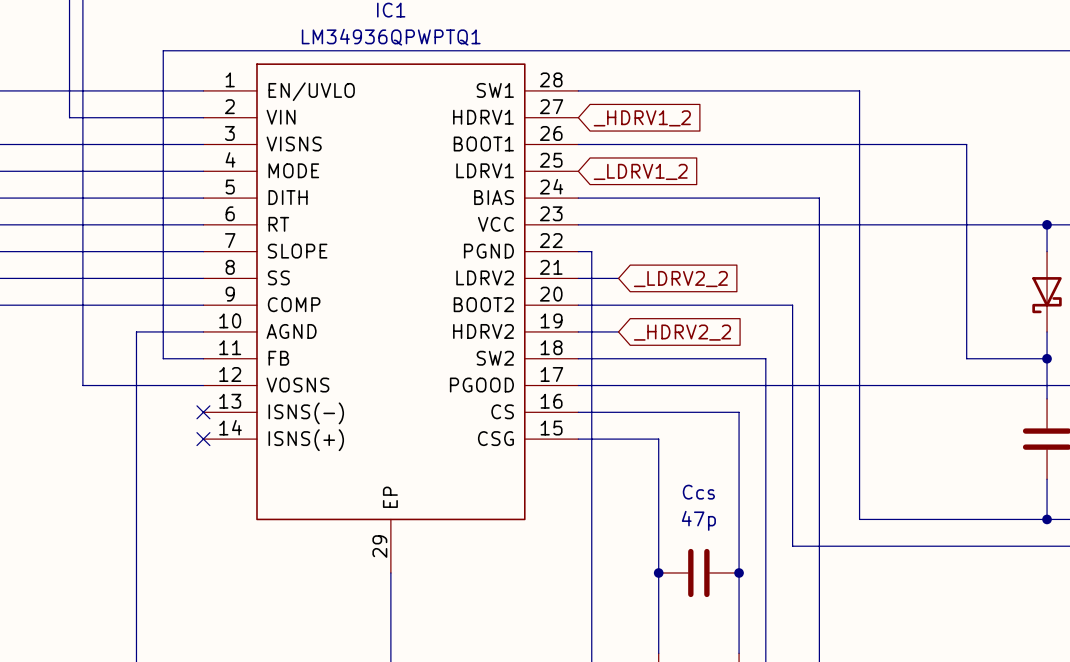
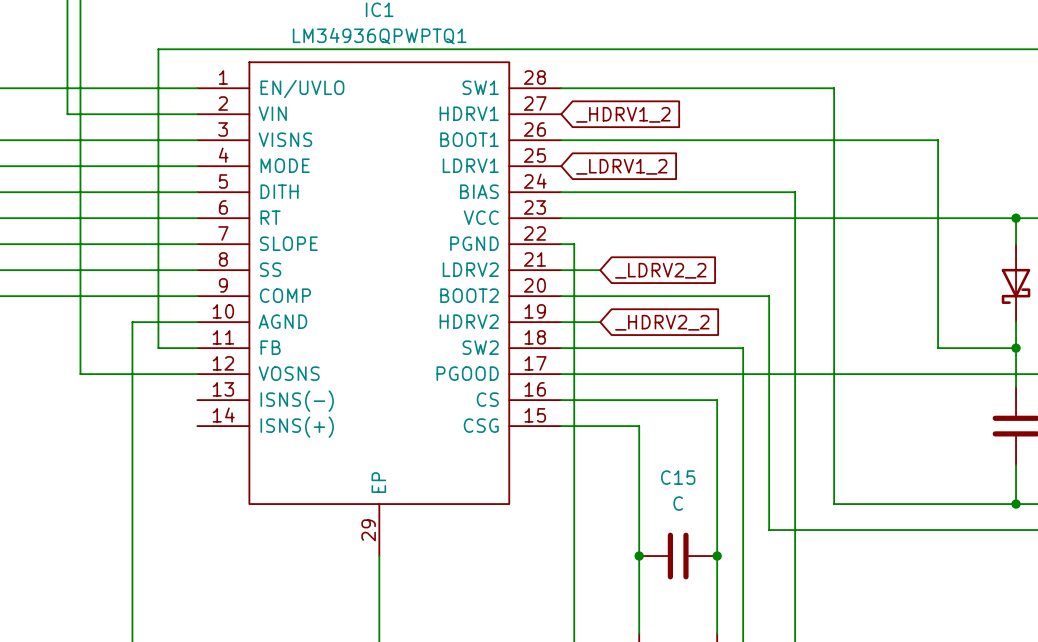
no-connect mark: (203, 412) -> none
no-connect mark: (203, 439) -> none
Ccs name: Ccs (698, 492) -> C15 (678, 477)
Ccs value: 47p (698, 520) -> C (678, 503)

